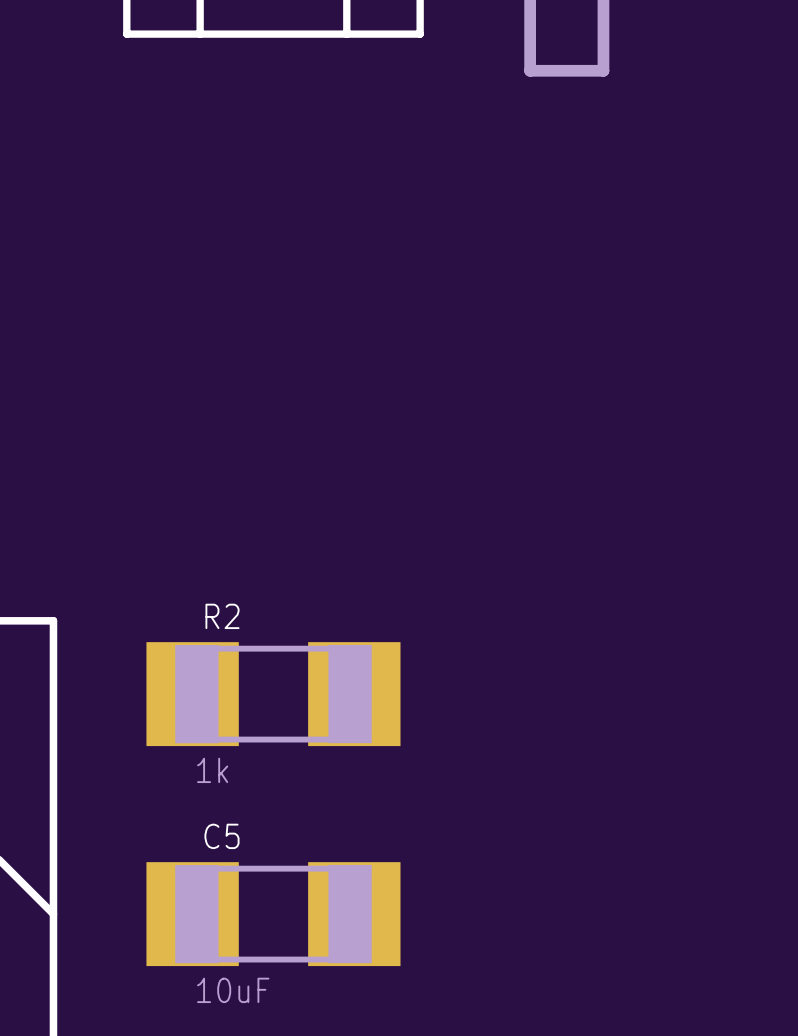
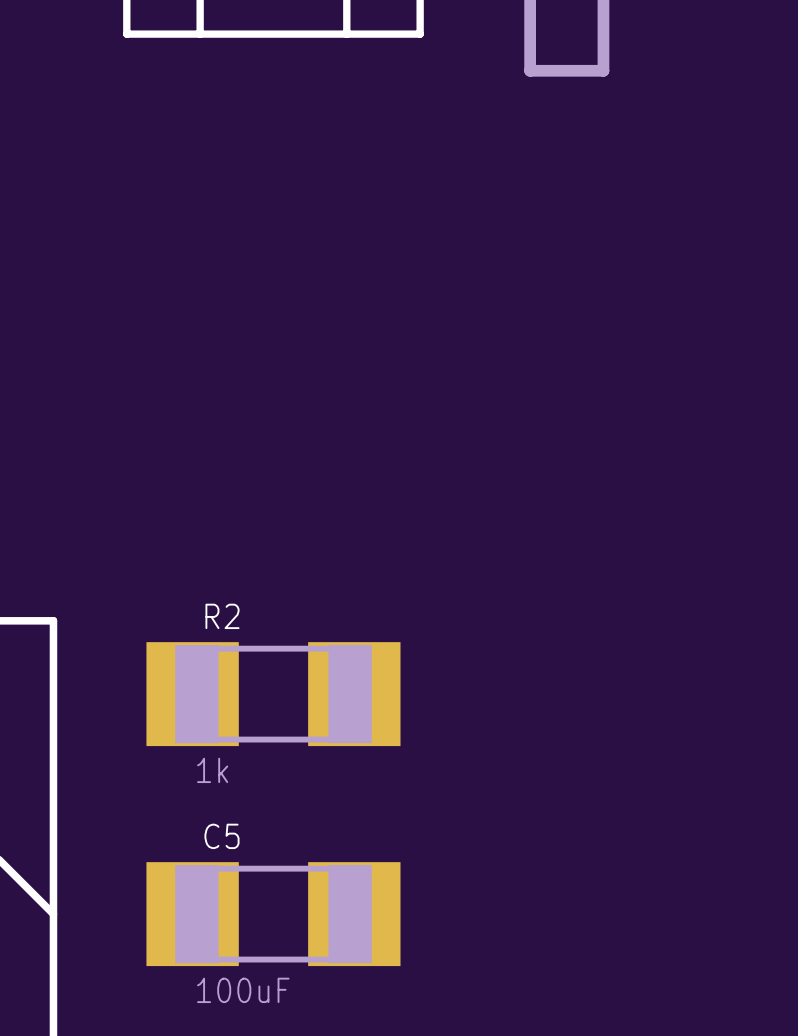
C5 value: 10uF (233, 990) -> 100uF (243, 990)

